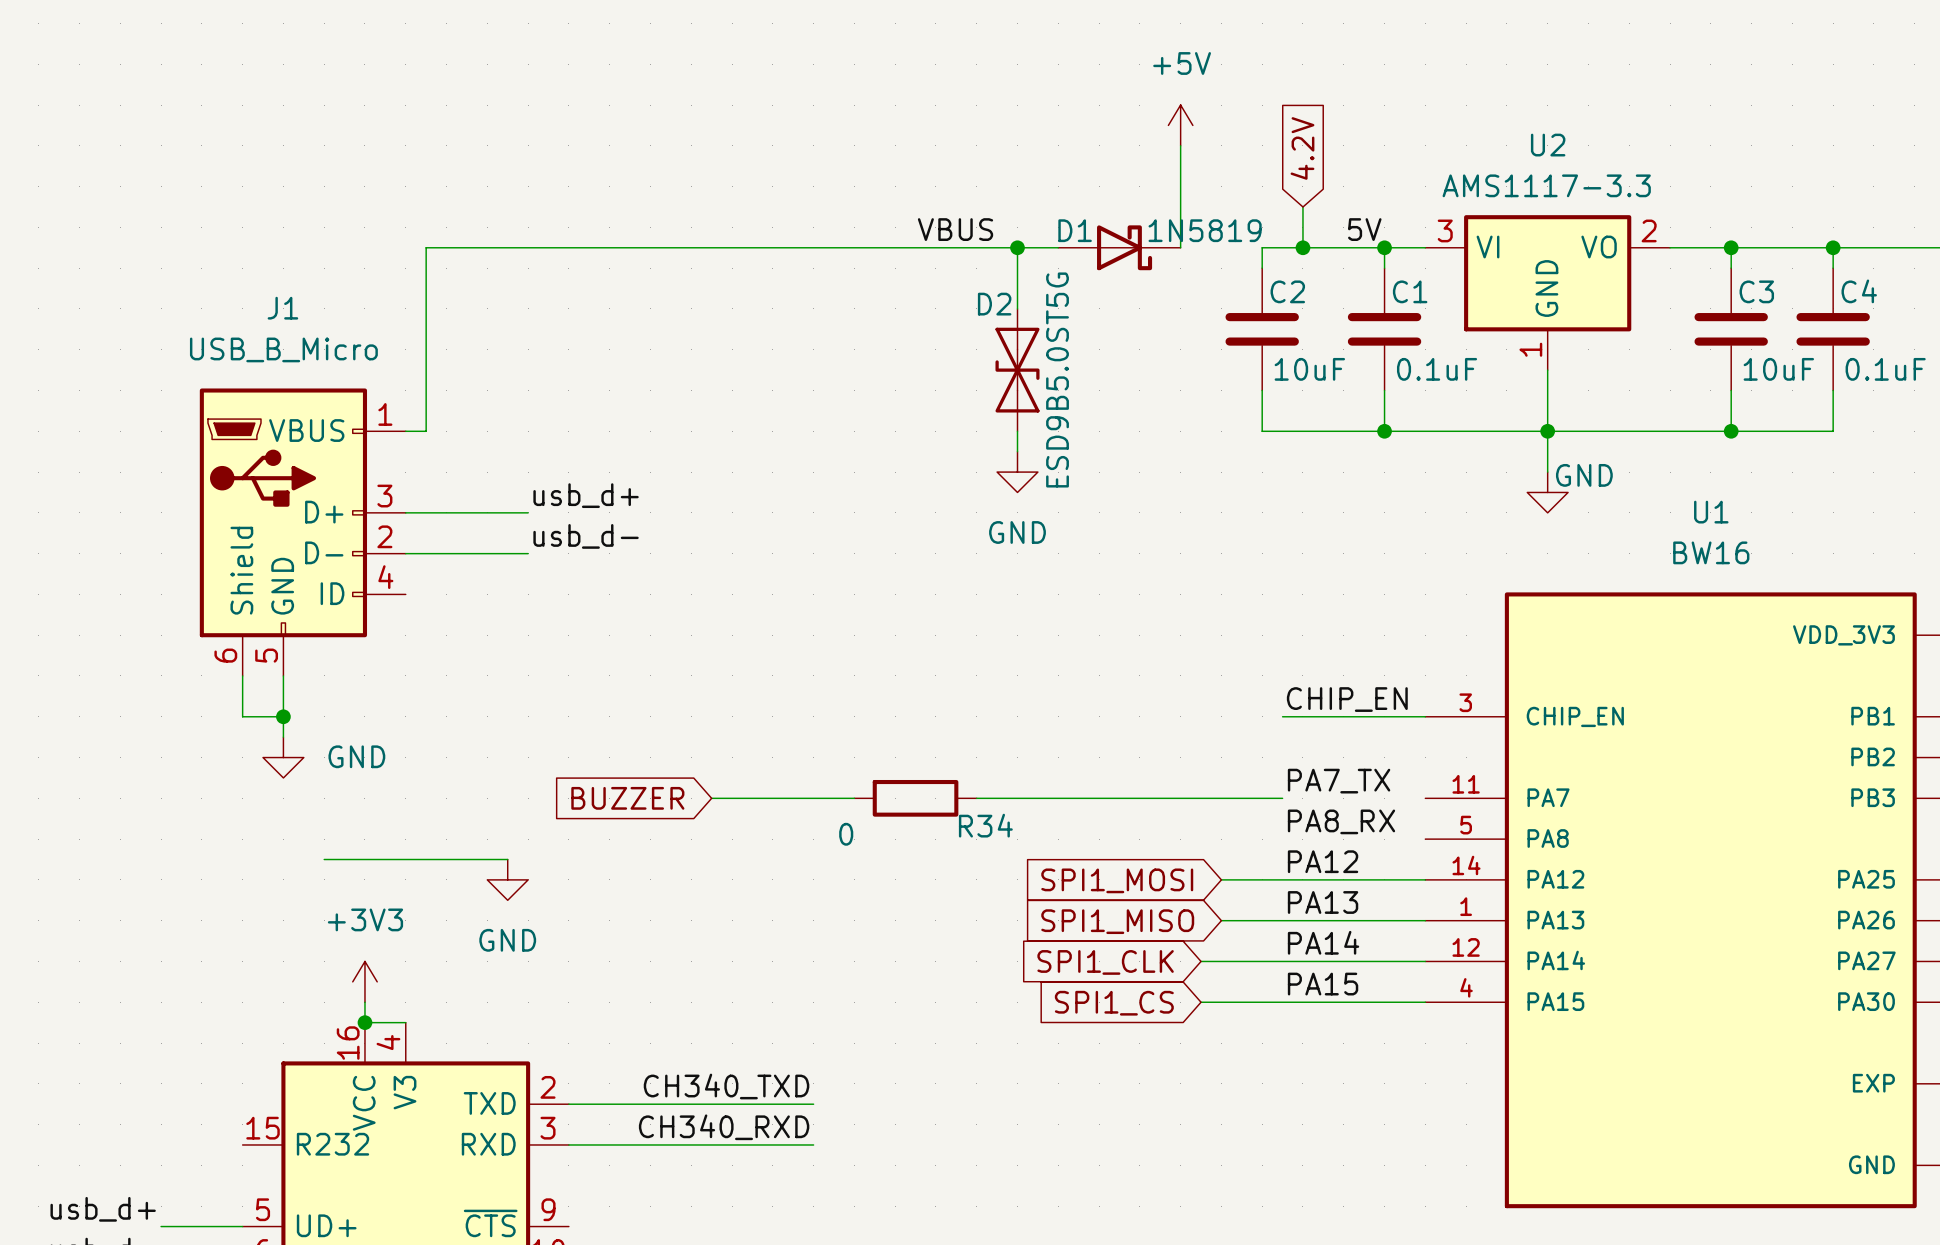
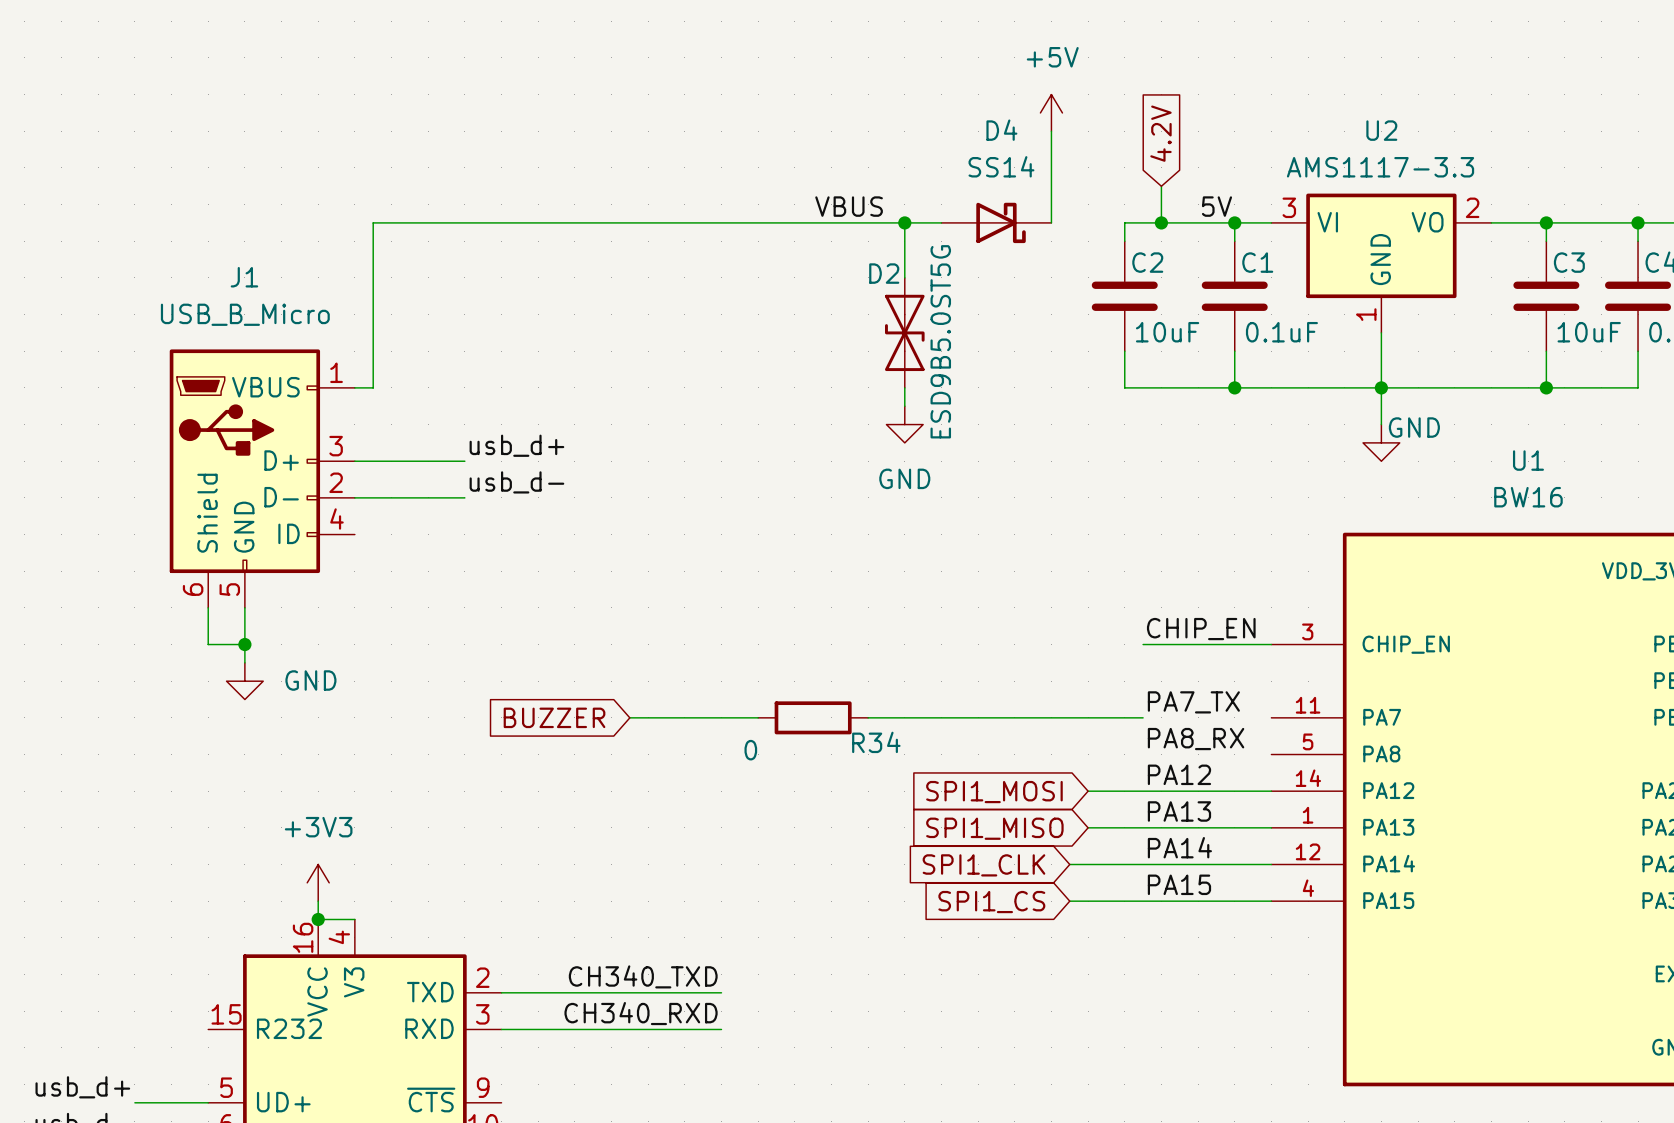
D1 name: D1 (1075, 230) -> D4 (1001, 130)
D1 value: 1N5819 (1205, 230) -> SS14 (1001, 166)
wire: (324, 859) (507, 859) -> none
power symbol: GND (507, 879) -> none

